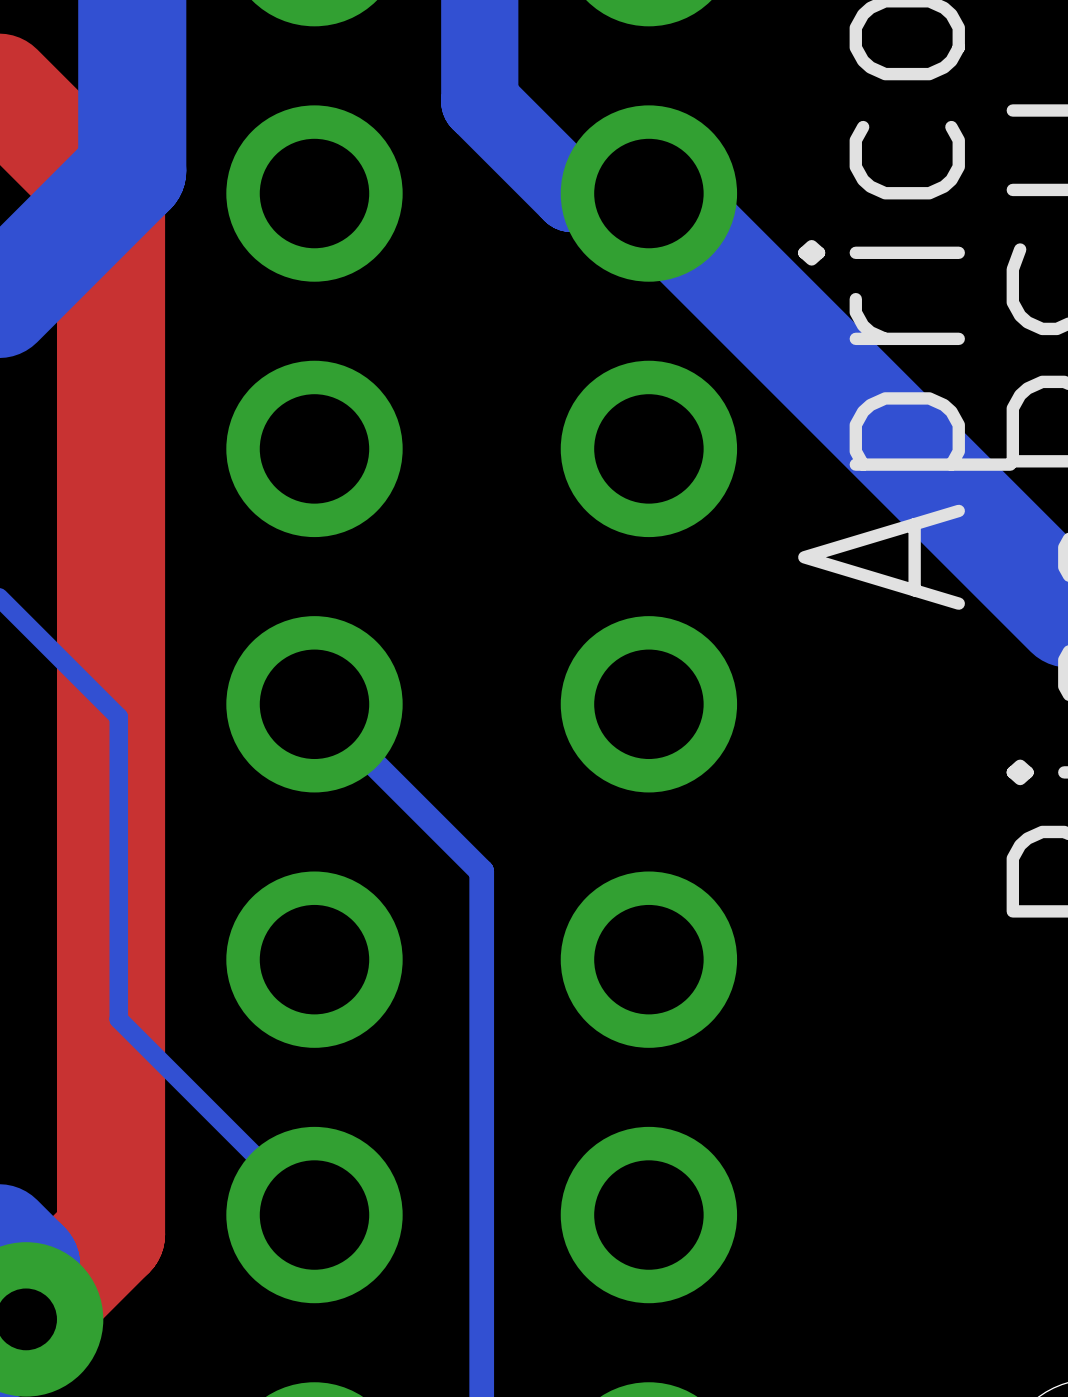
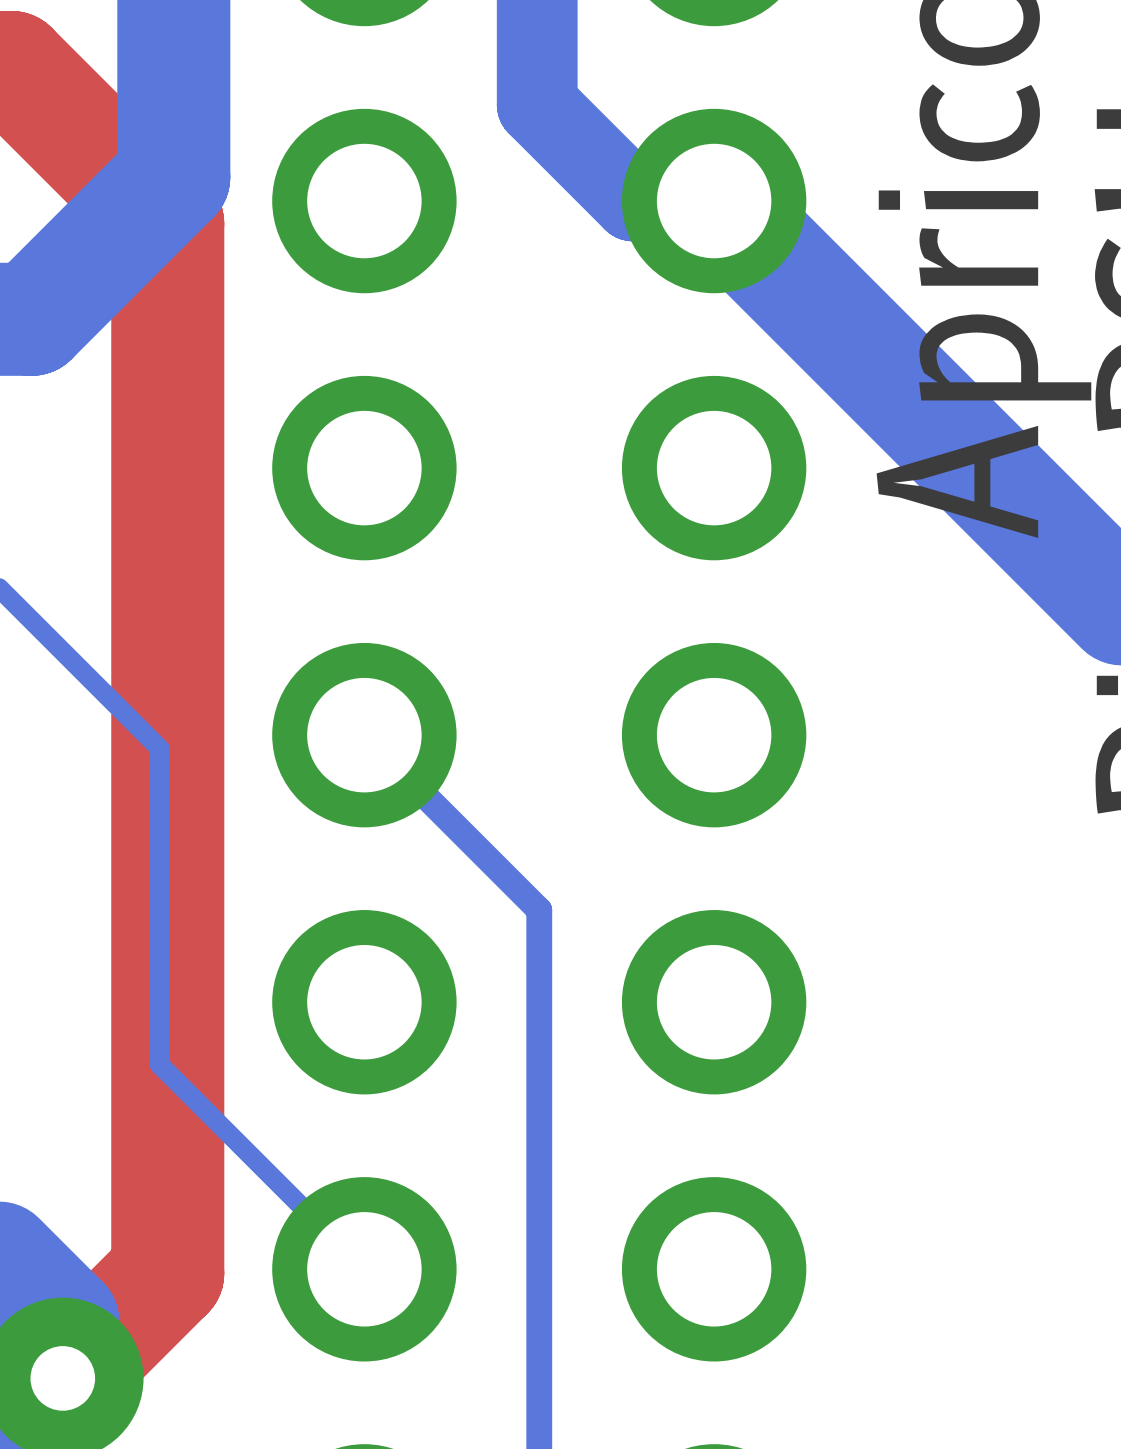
top track: (111, 199) (111, 1234) -> (151, 207) (167, 223) (167, 1273) (151, 1289)

